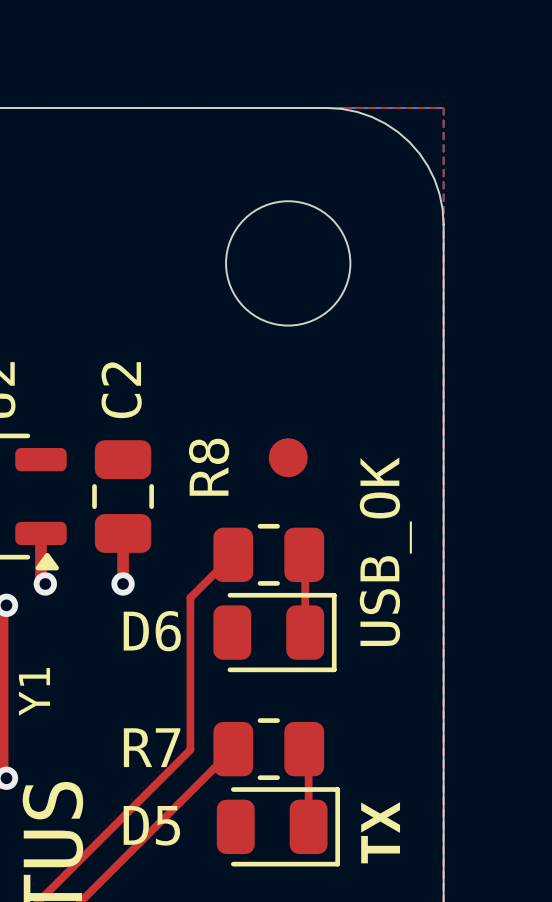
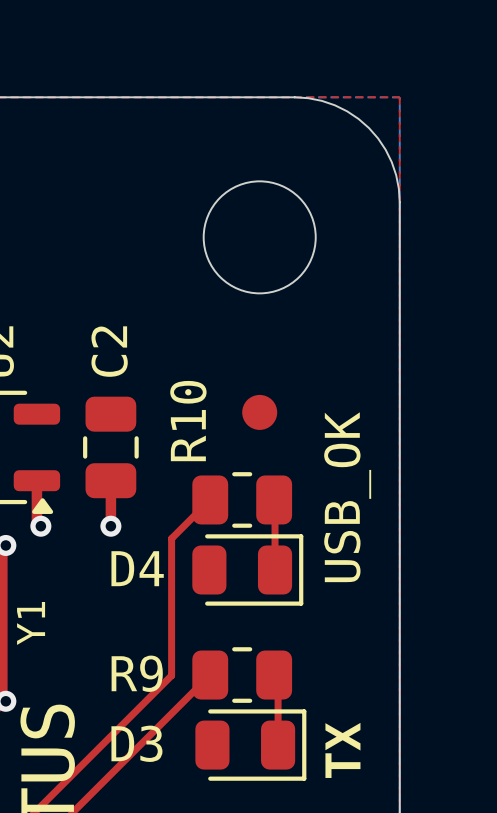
R8 name: R8 (209, 467) -> R10 (188, 421)
D6 name: D6 (152, 631) -> D4 (137, 568)
R7 name: R7 (152, 747) -> R9 (137, 673)
D5 name: D5 (151, 825) -> D3 (136, 743)

